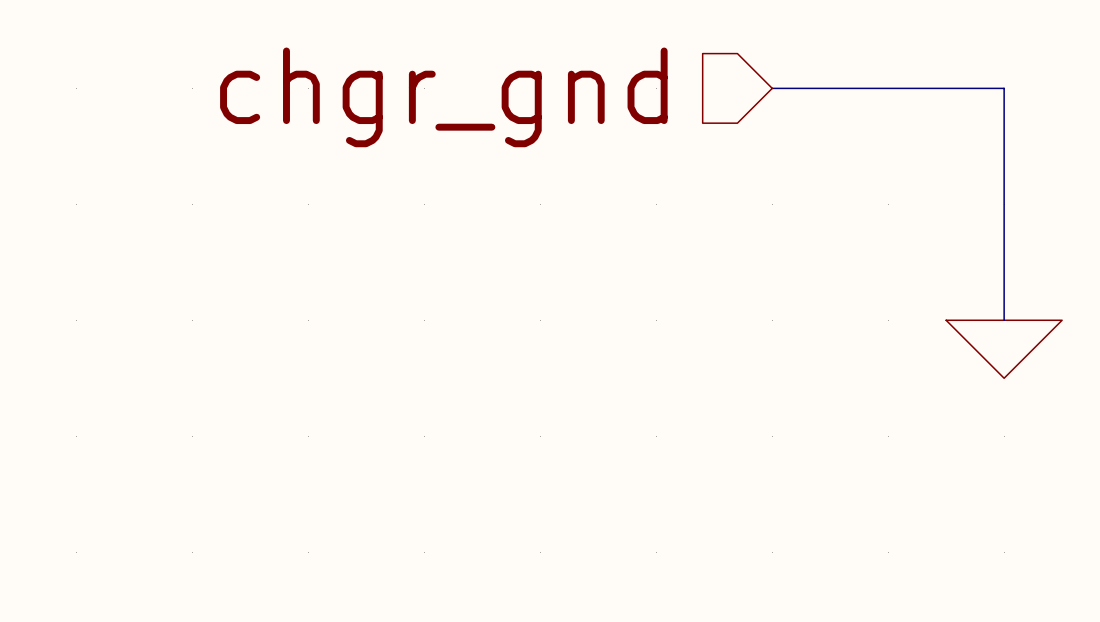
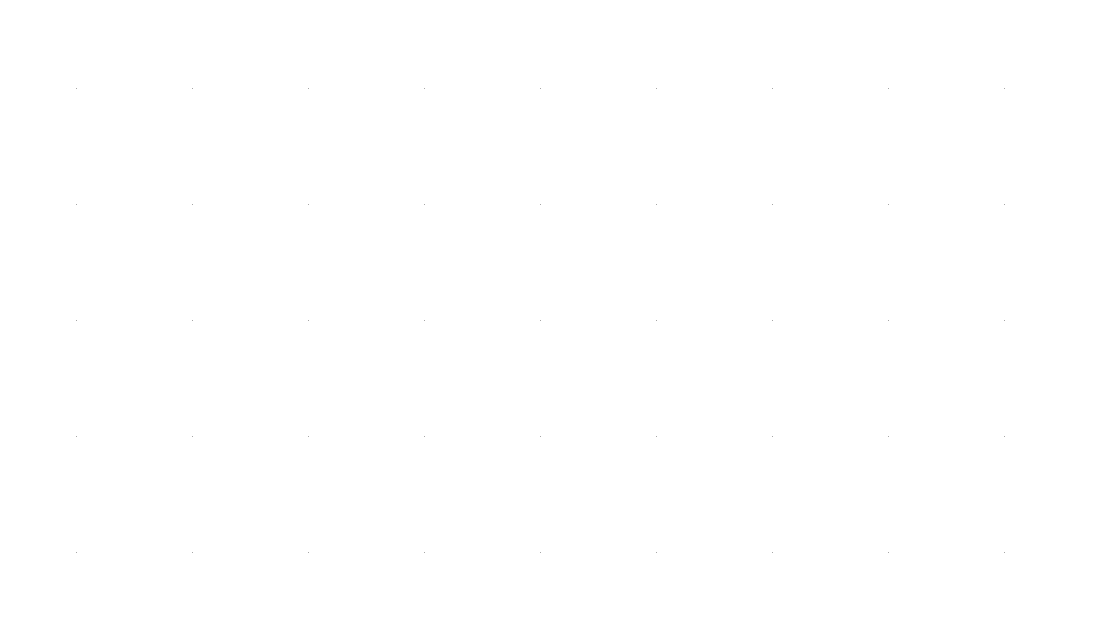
wire: (772, 88) (1004, 88) (1004, 320) -> none
hierarchical label: chgr_gnd (443, 97) -> none
power symbol: (1004, 349) -> none

